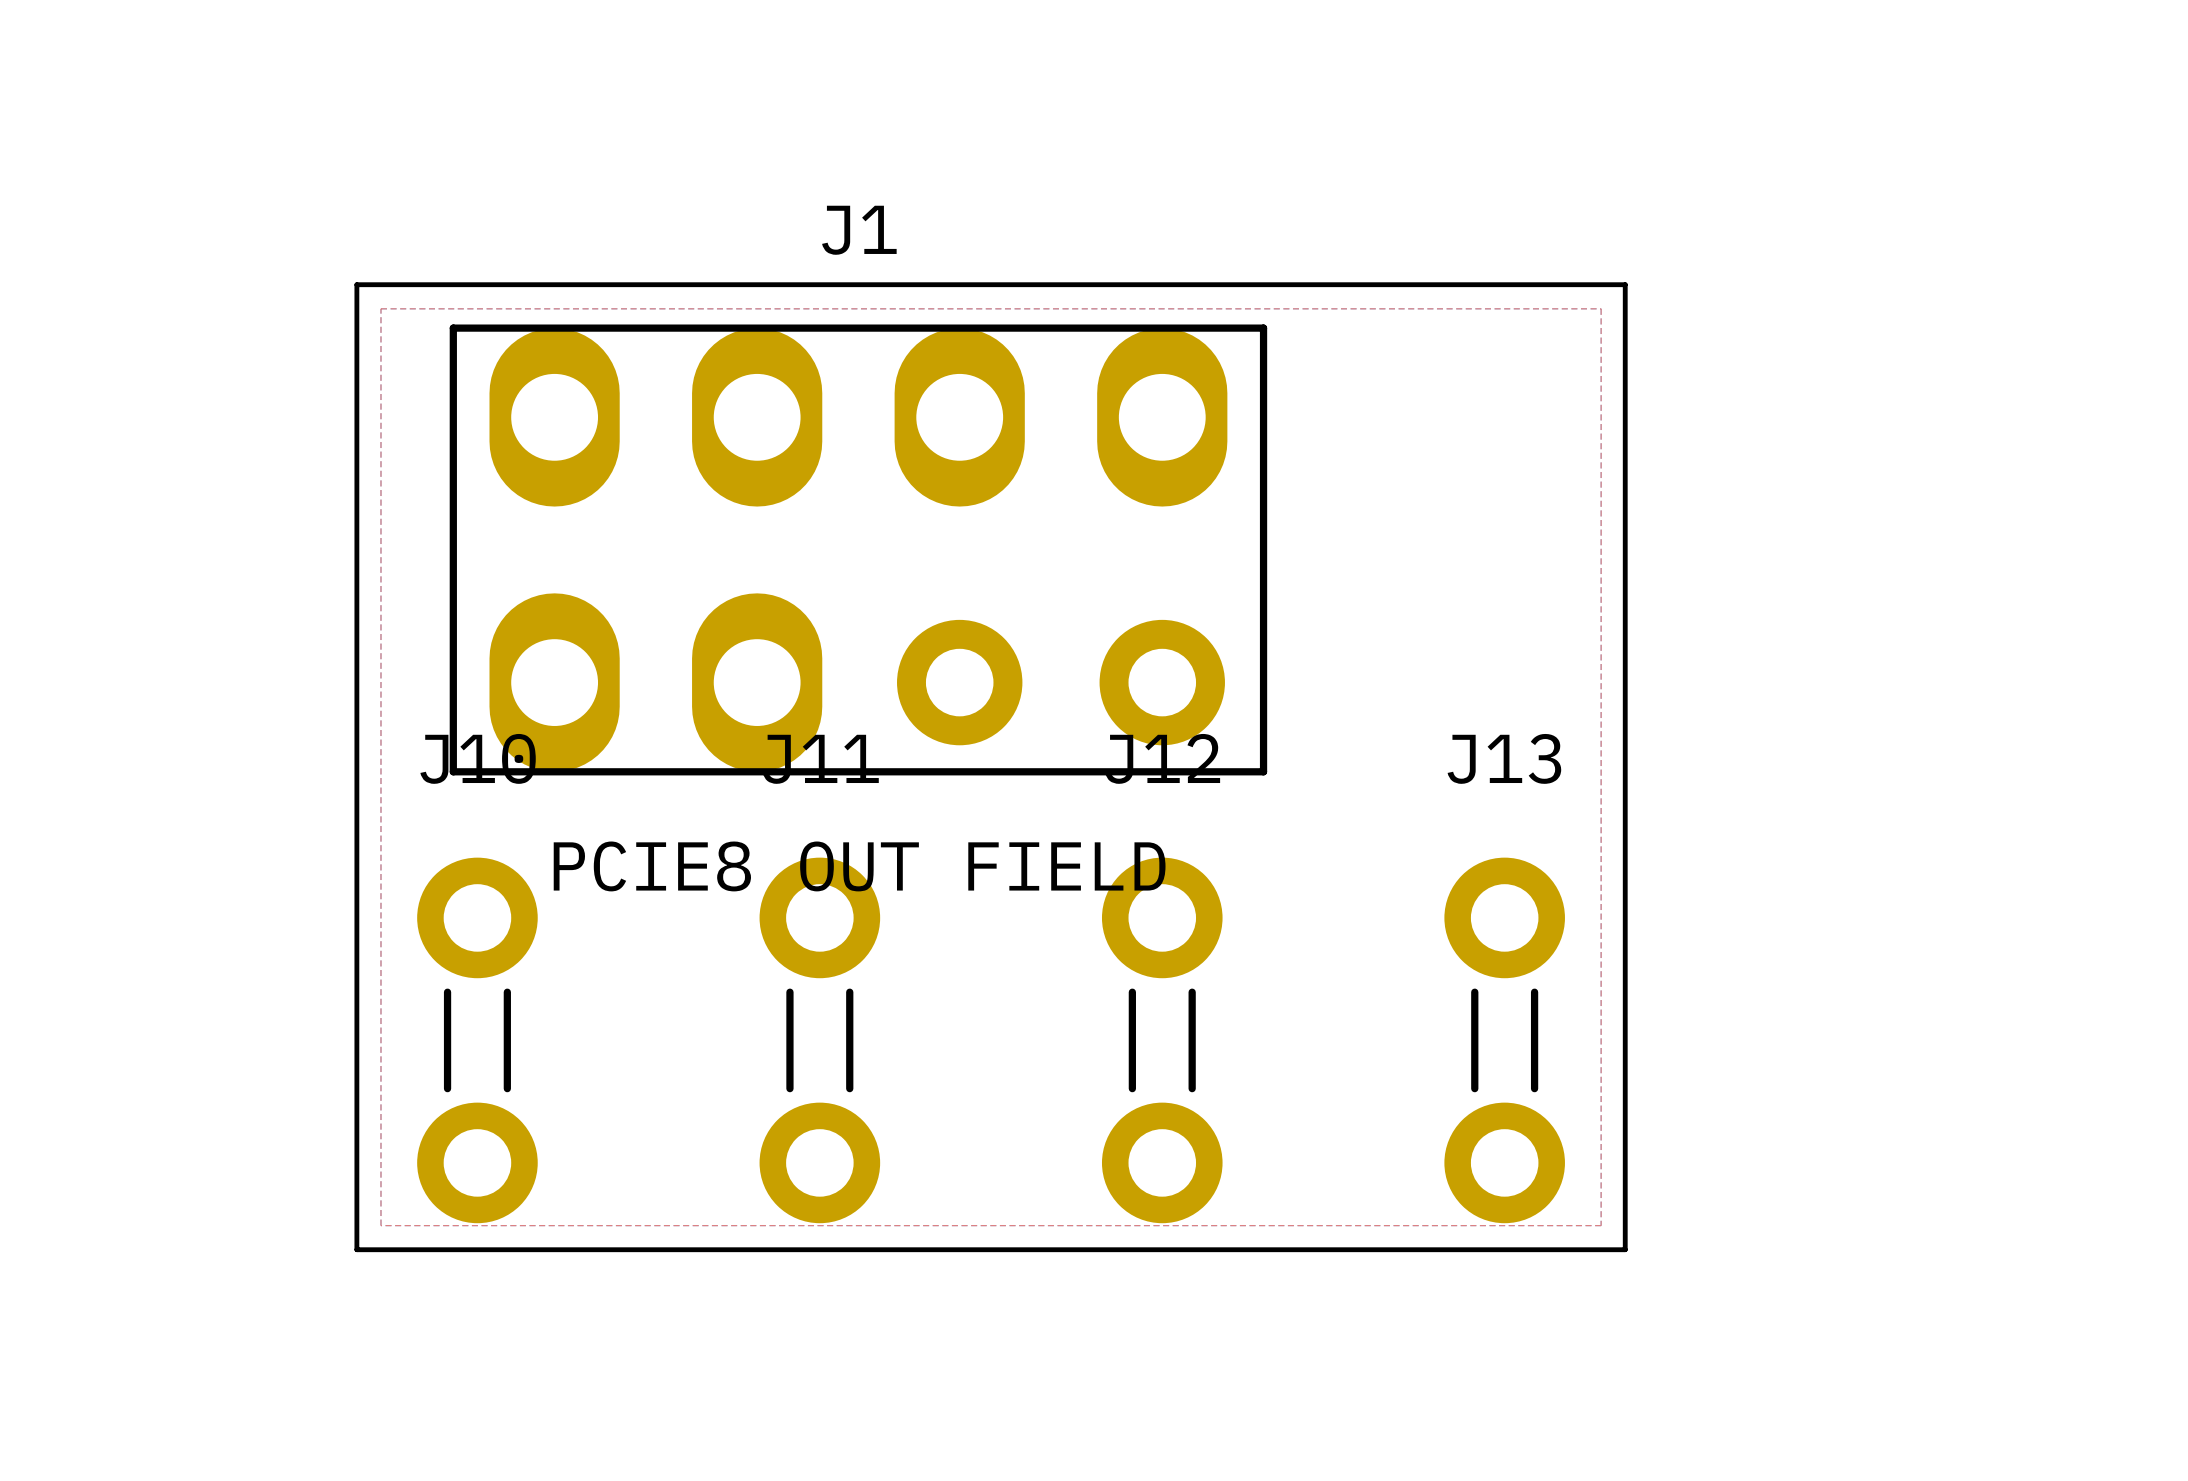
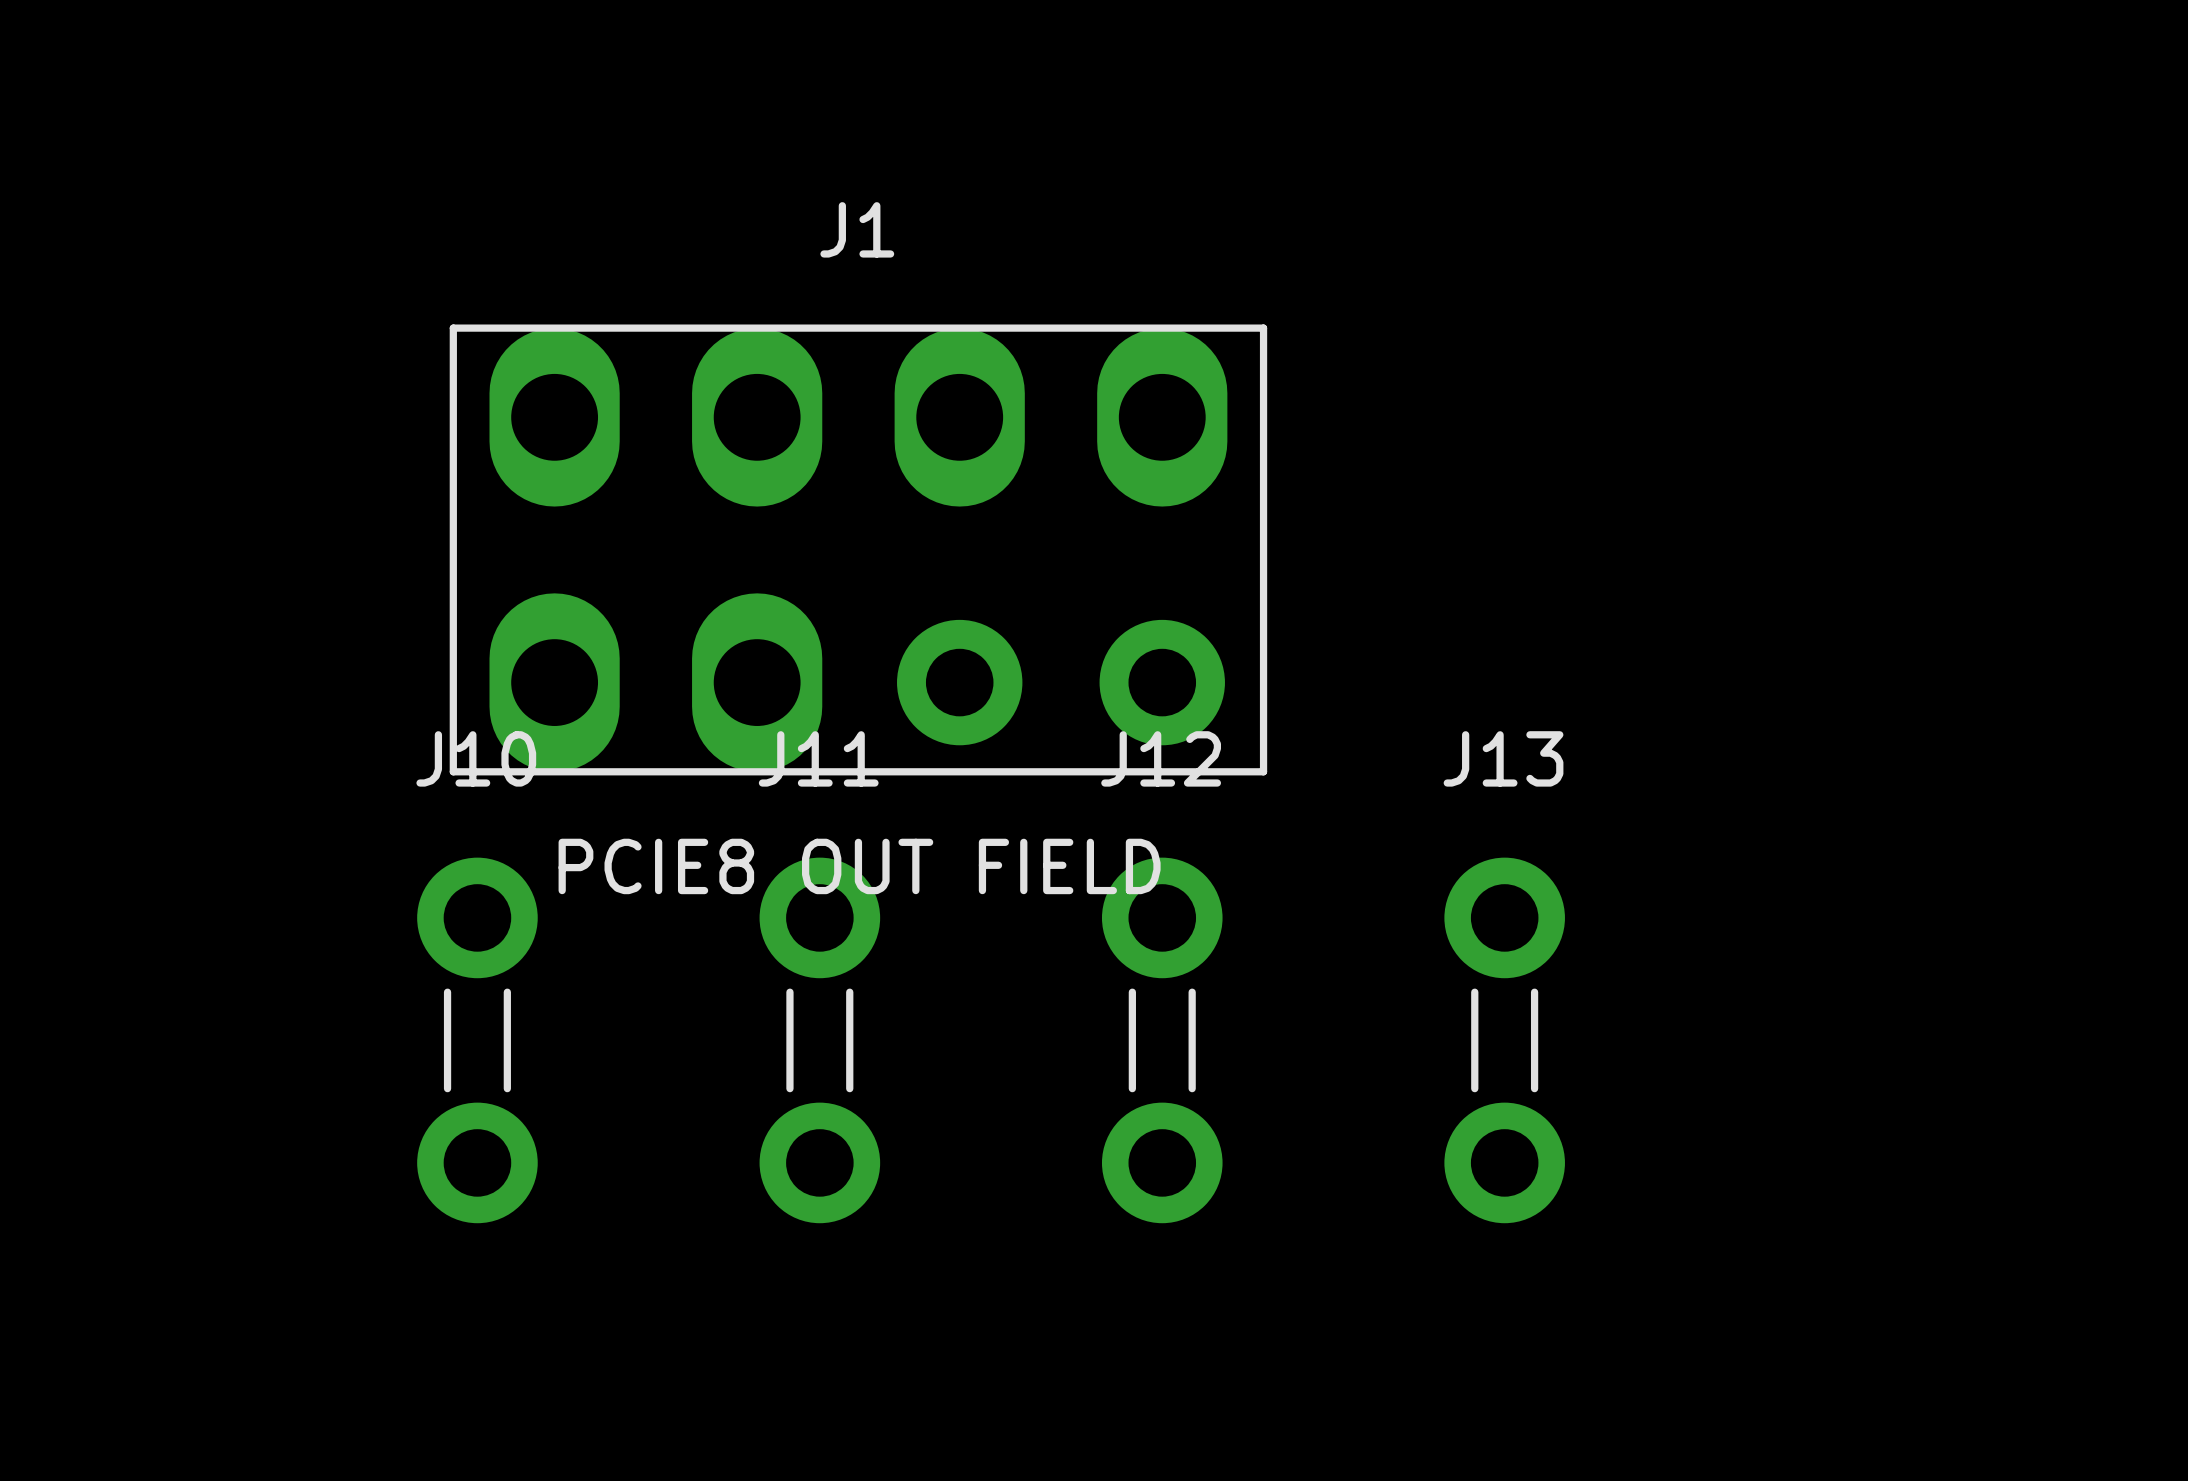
board edge: (356, 284) (1625, 284) (1625, 1249) (356, 1249) (356, 284) -> none
top zone outline: (380, 308) (1601, 308) (1601, 1225) (380, 1225) (380, 308) -> none

